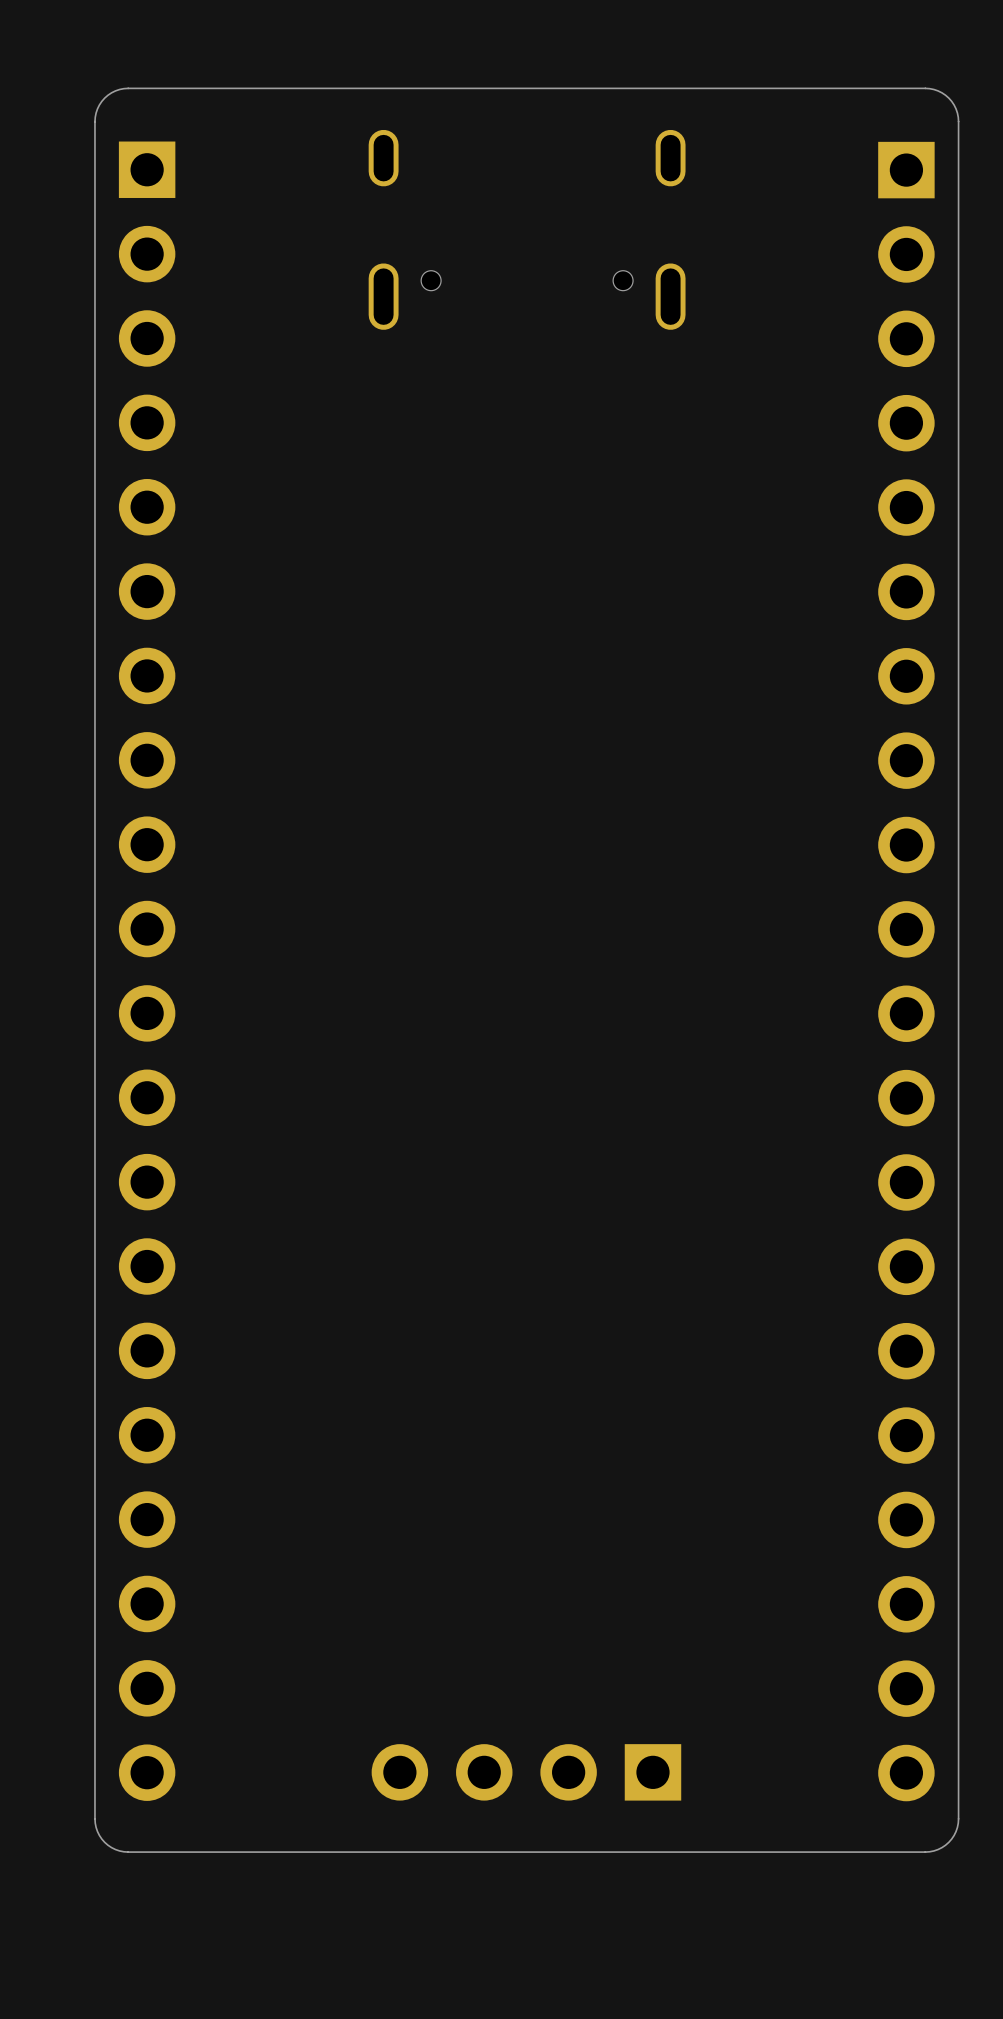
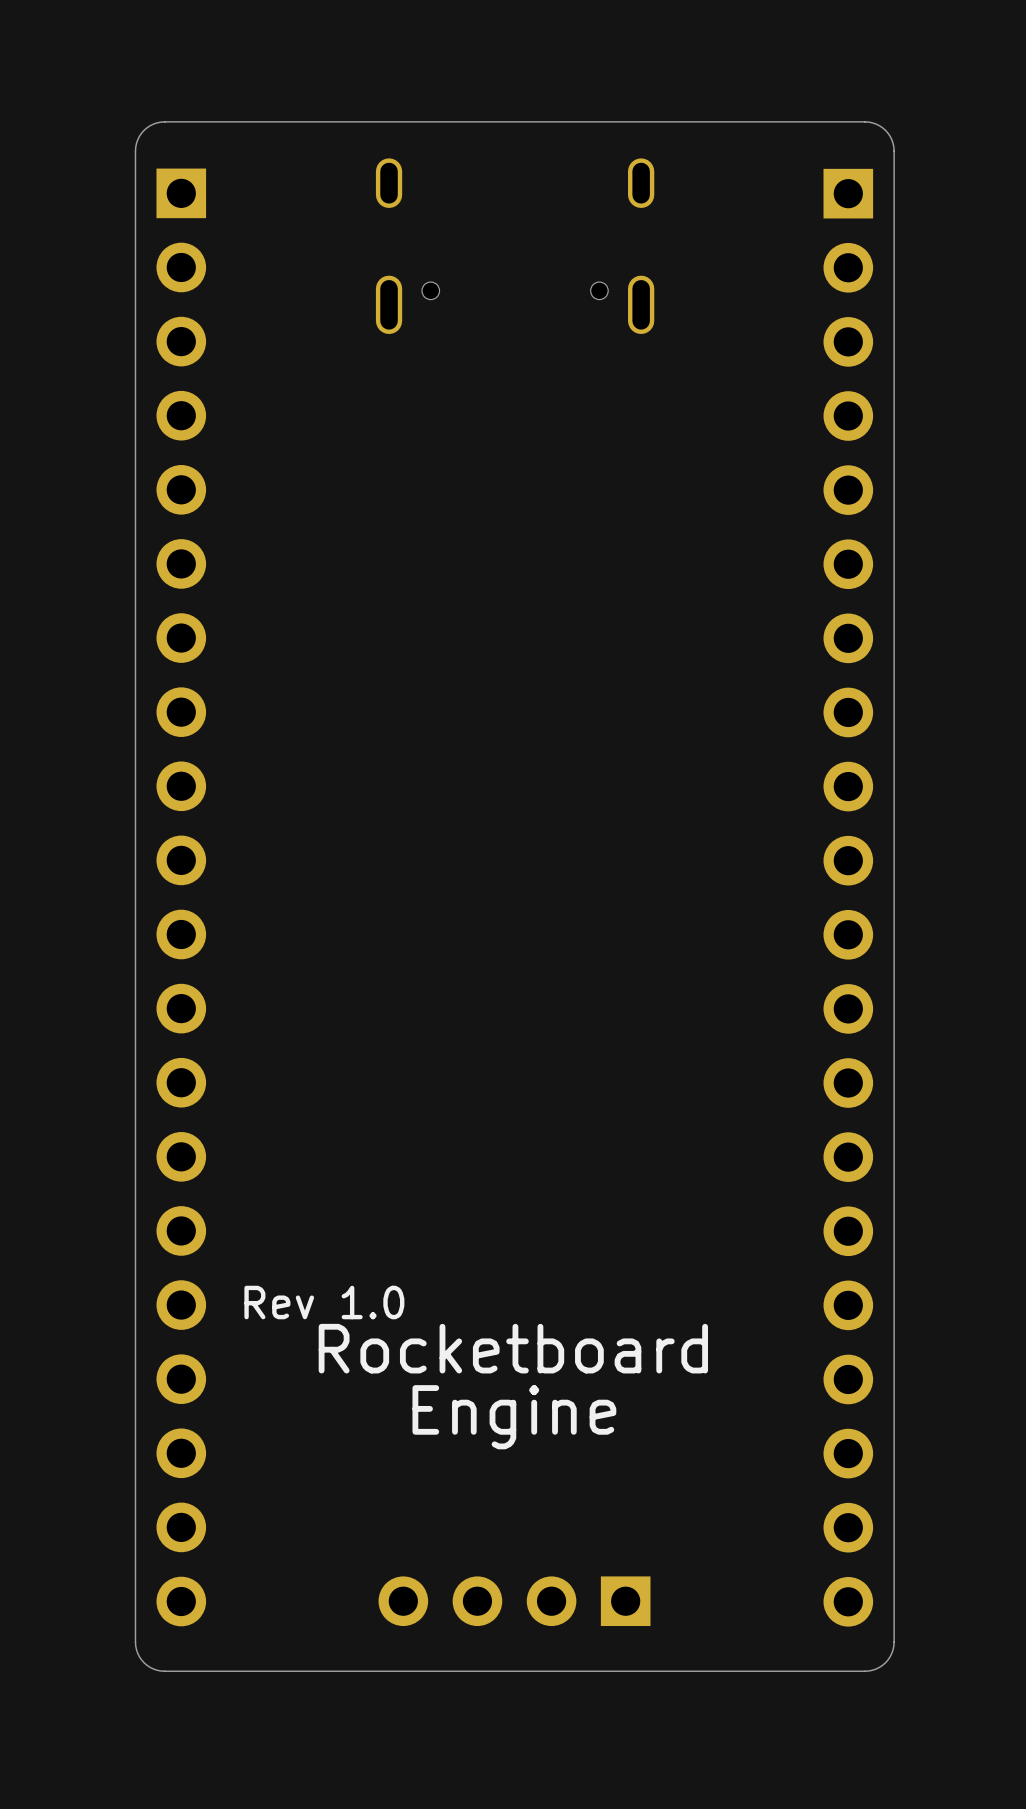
drawing: none -> [244, 1285, 709, 1450]

